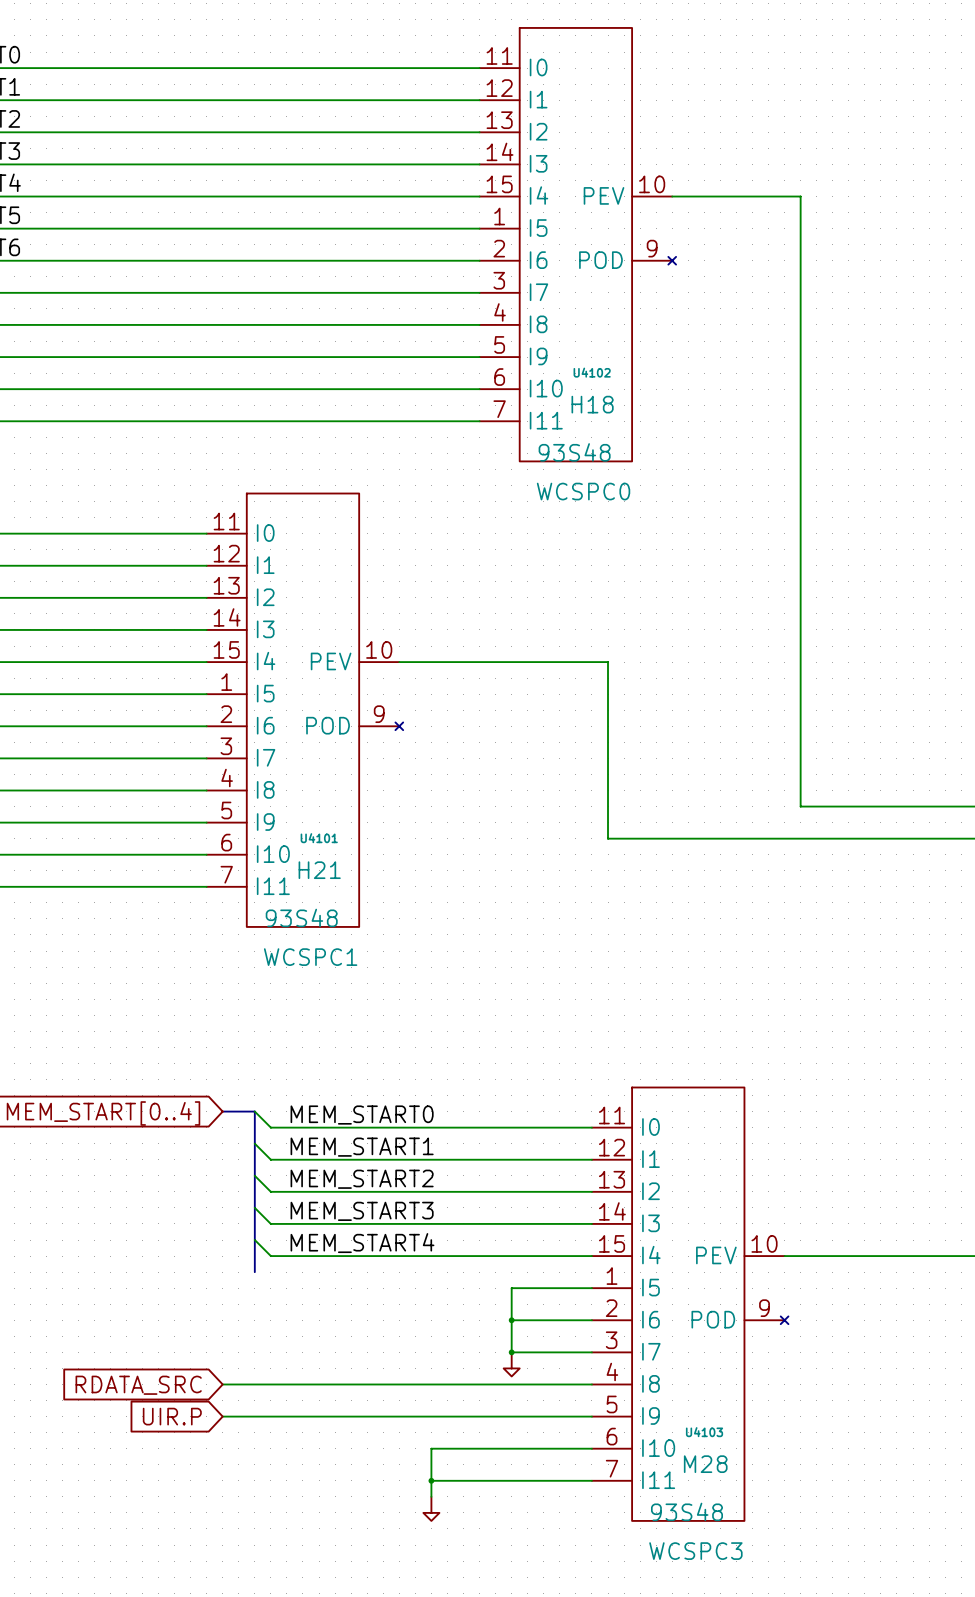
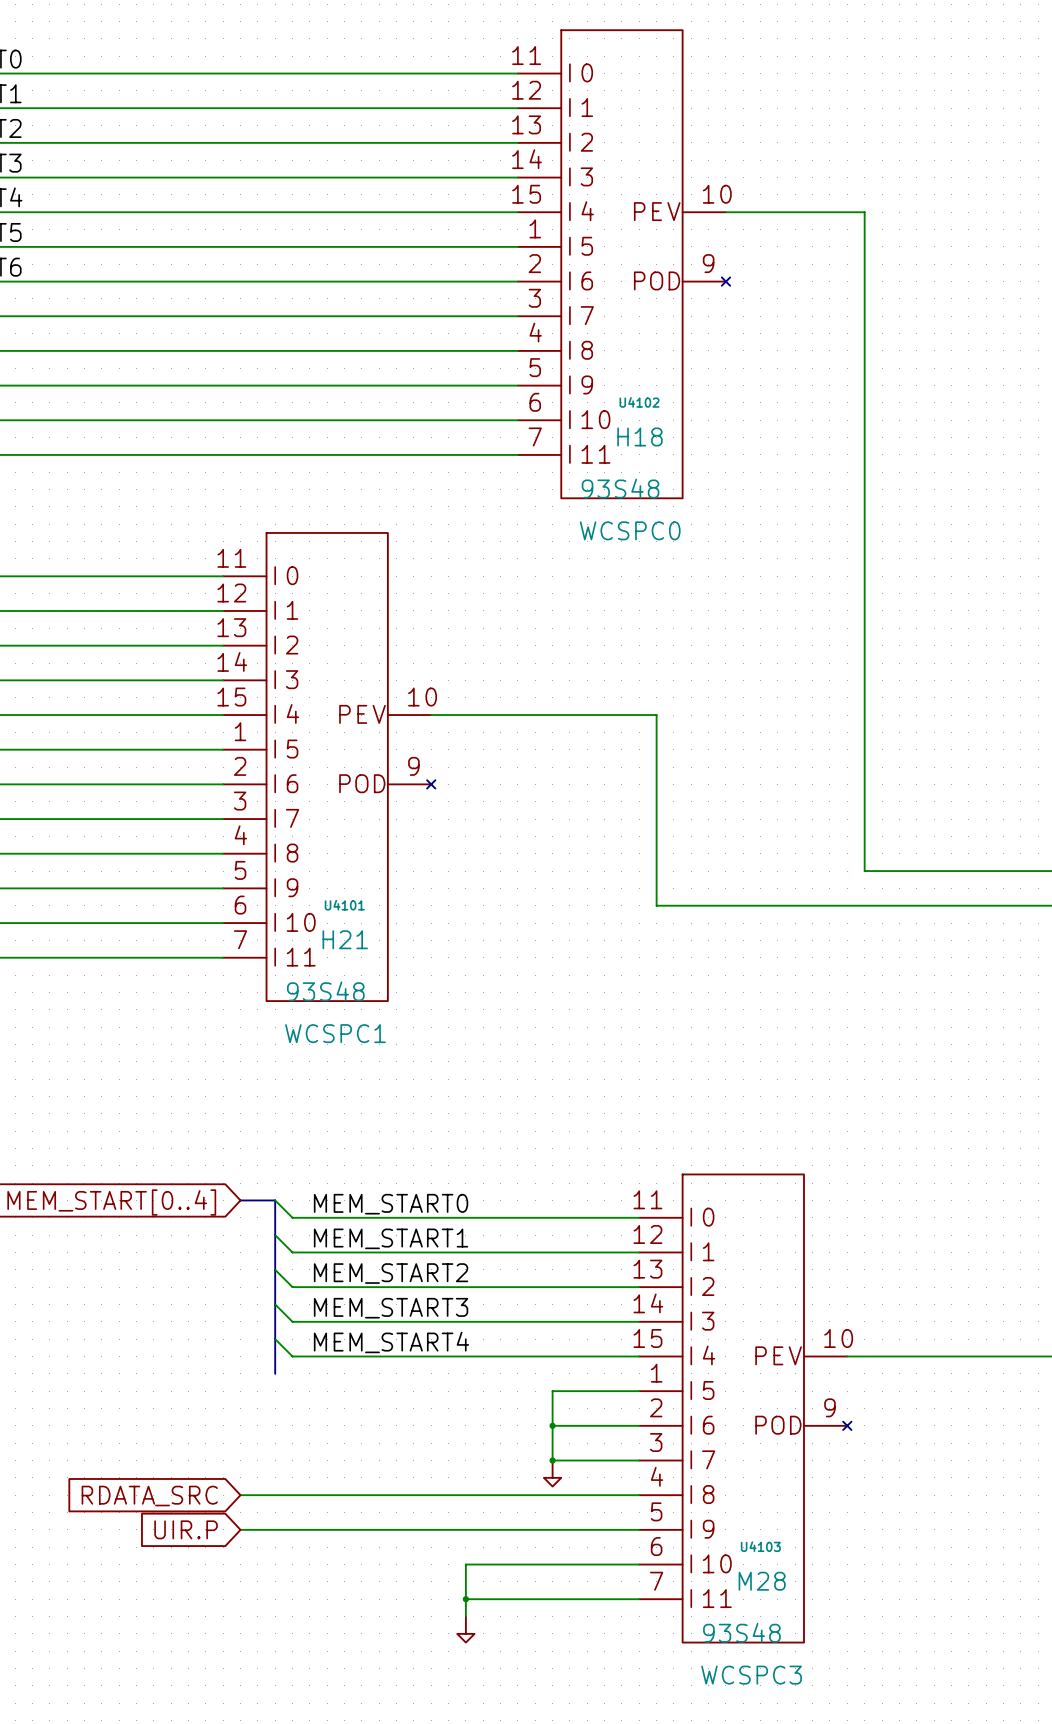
U4102 symbol: [479, 27, 673, 462] -> [517, 30, 726, 499]
U4101 symbol: [206, 493, 400, 927] -> [223, 532, 432, 1002]
U4103 symbol: [591, 1087, 785, 1521] -> [639, 1174, 848, 1643]

